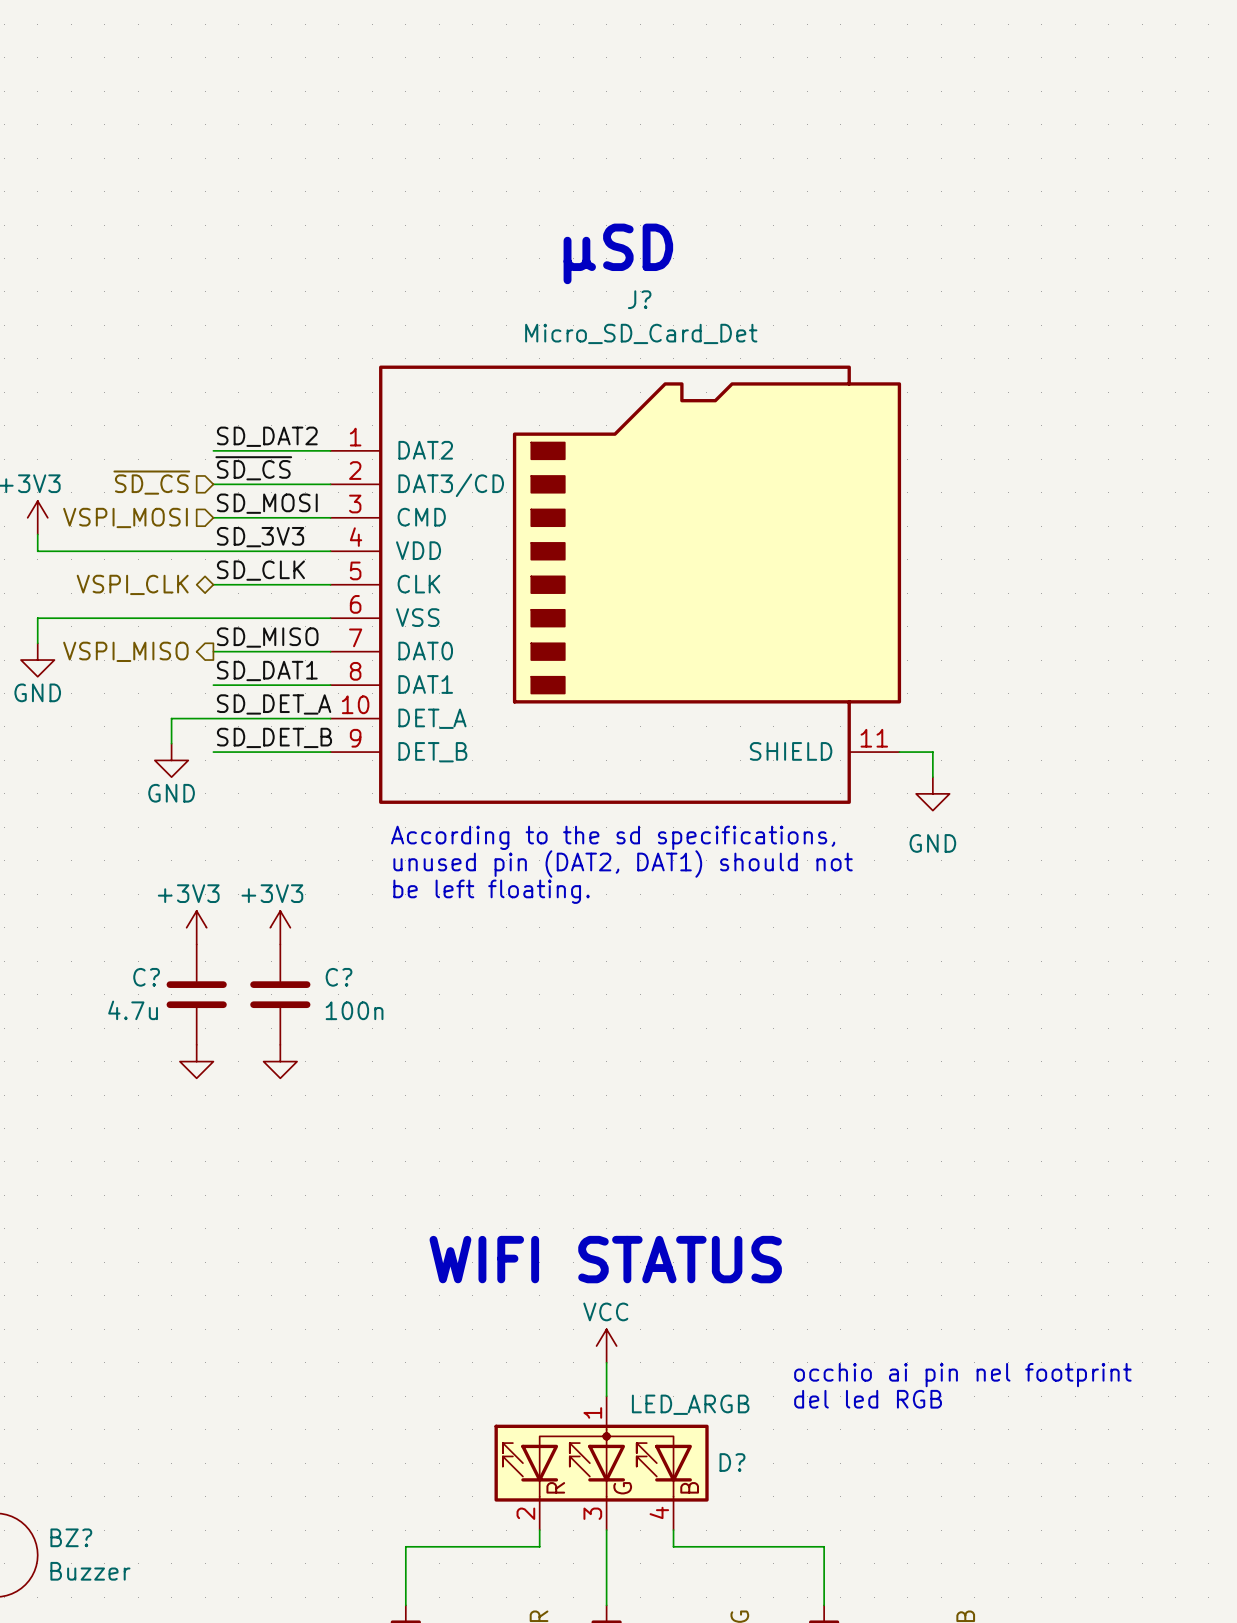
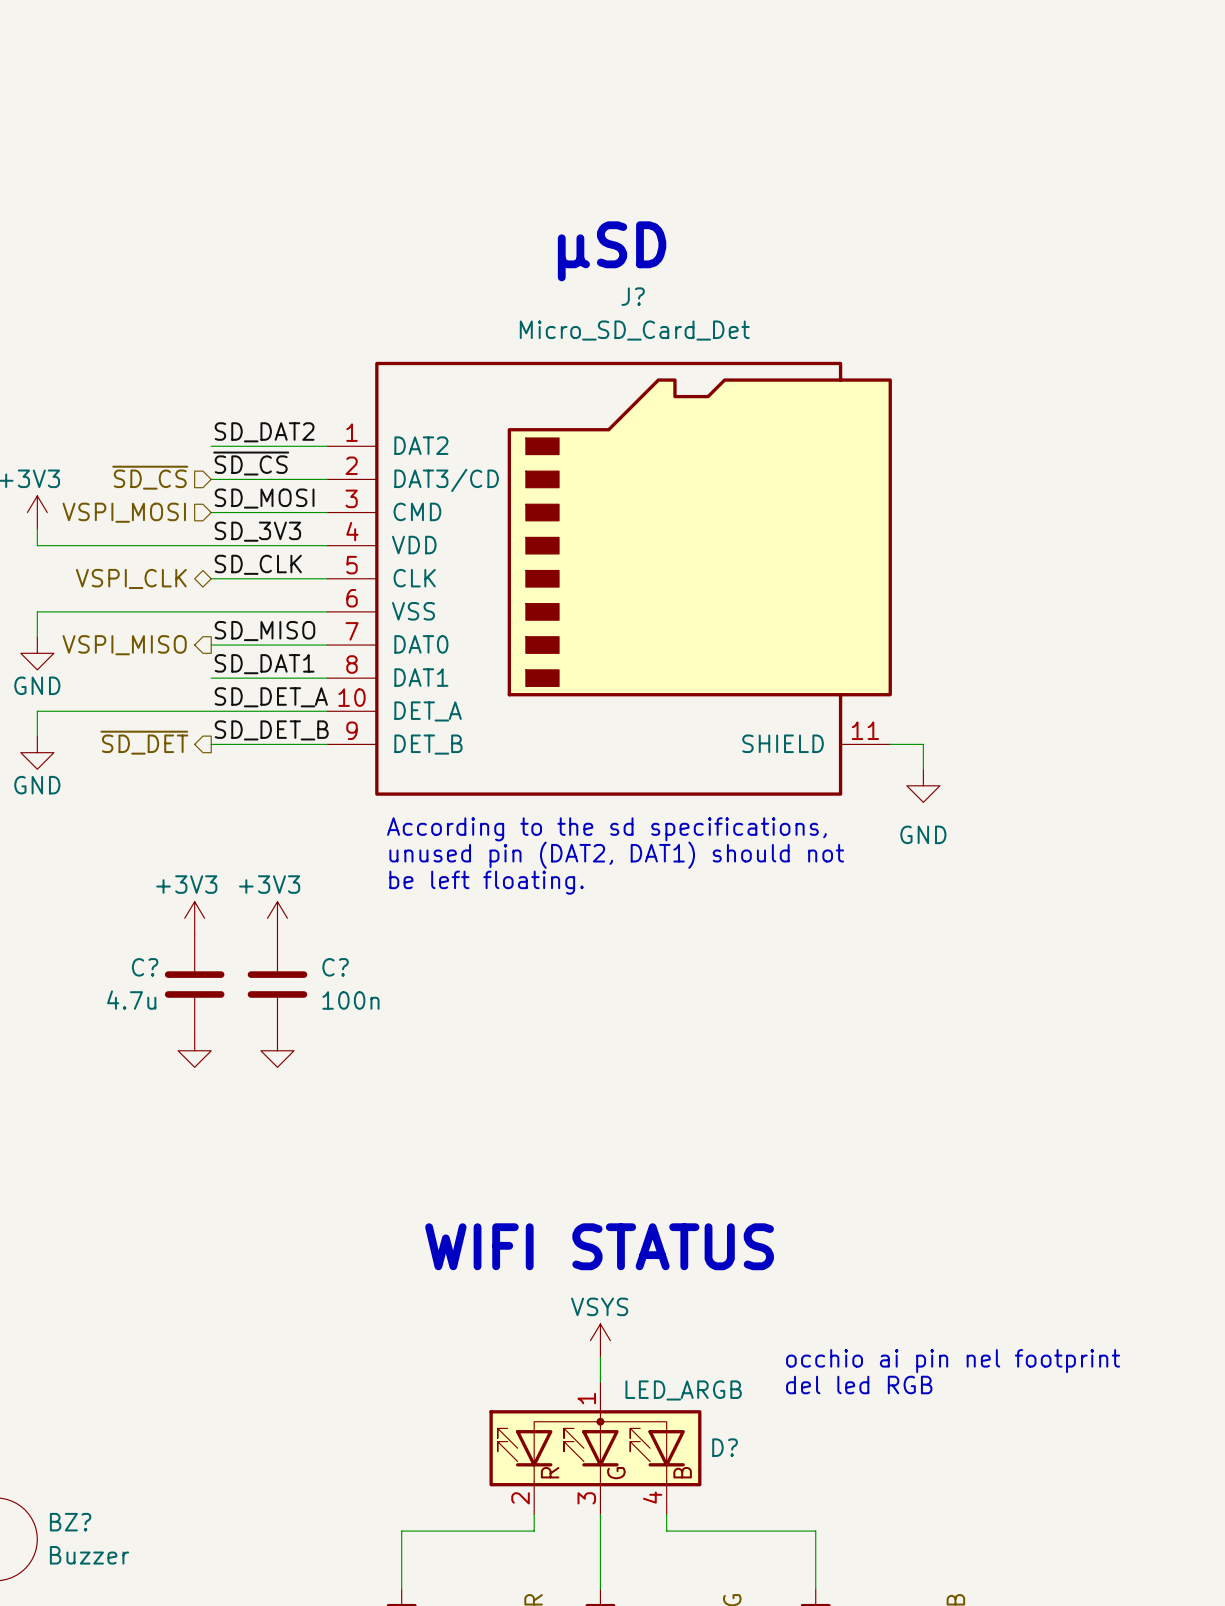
wire: (171, 718) (171, 743) -> (169, 711) (37, 711) (37, 736)
hierarchical label: none -> ~{SD_DET} (144, 742)
power symbol position: GND (171, 760) -> GND (37, 752)
power symbol: VCC (606, 1346) -> VSYS (600, 1340)

